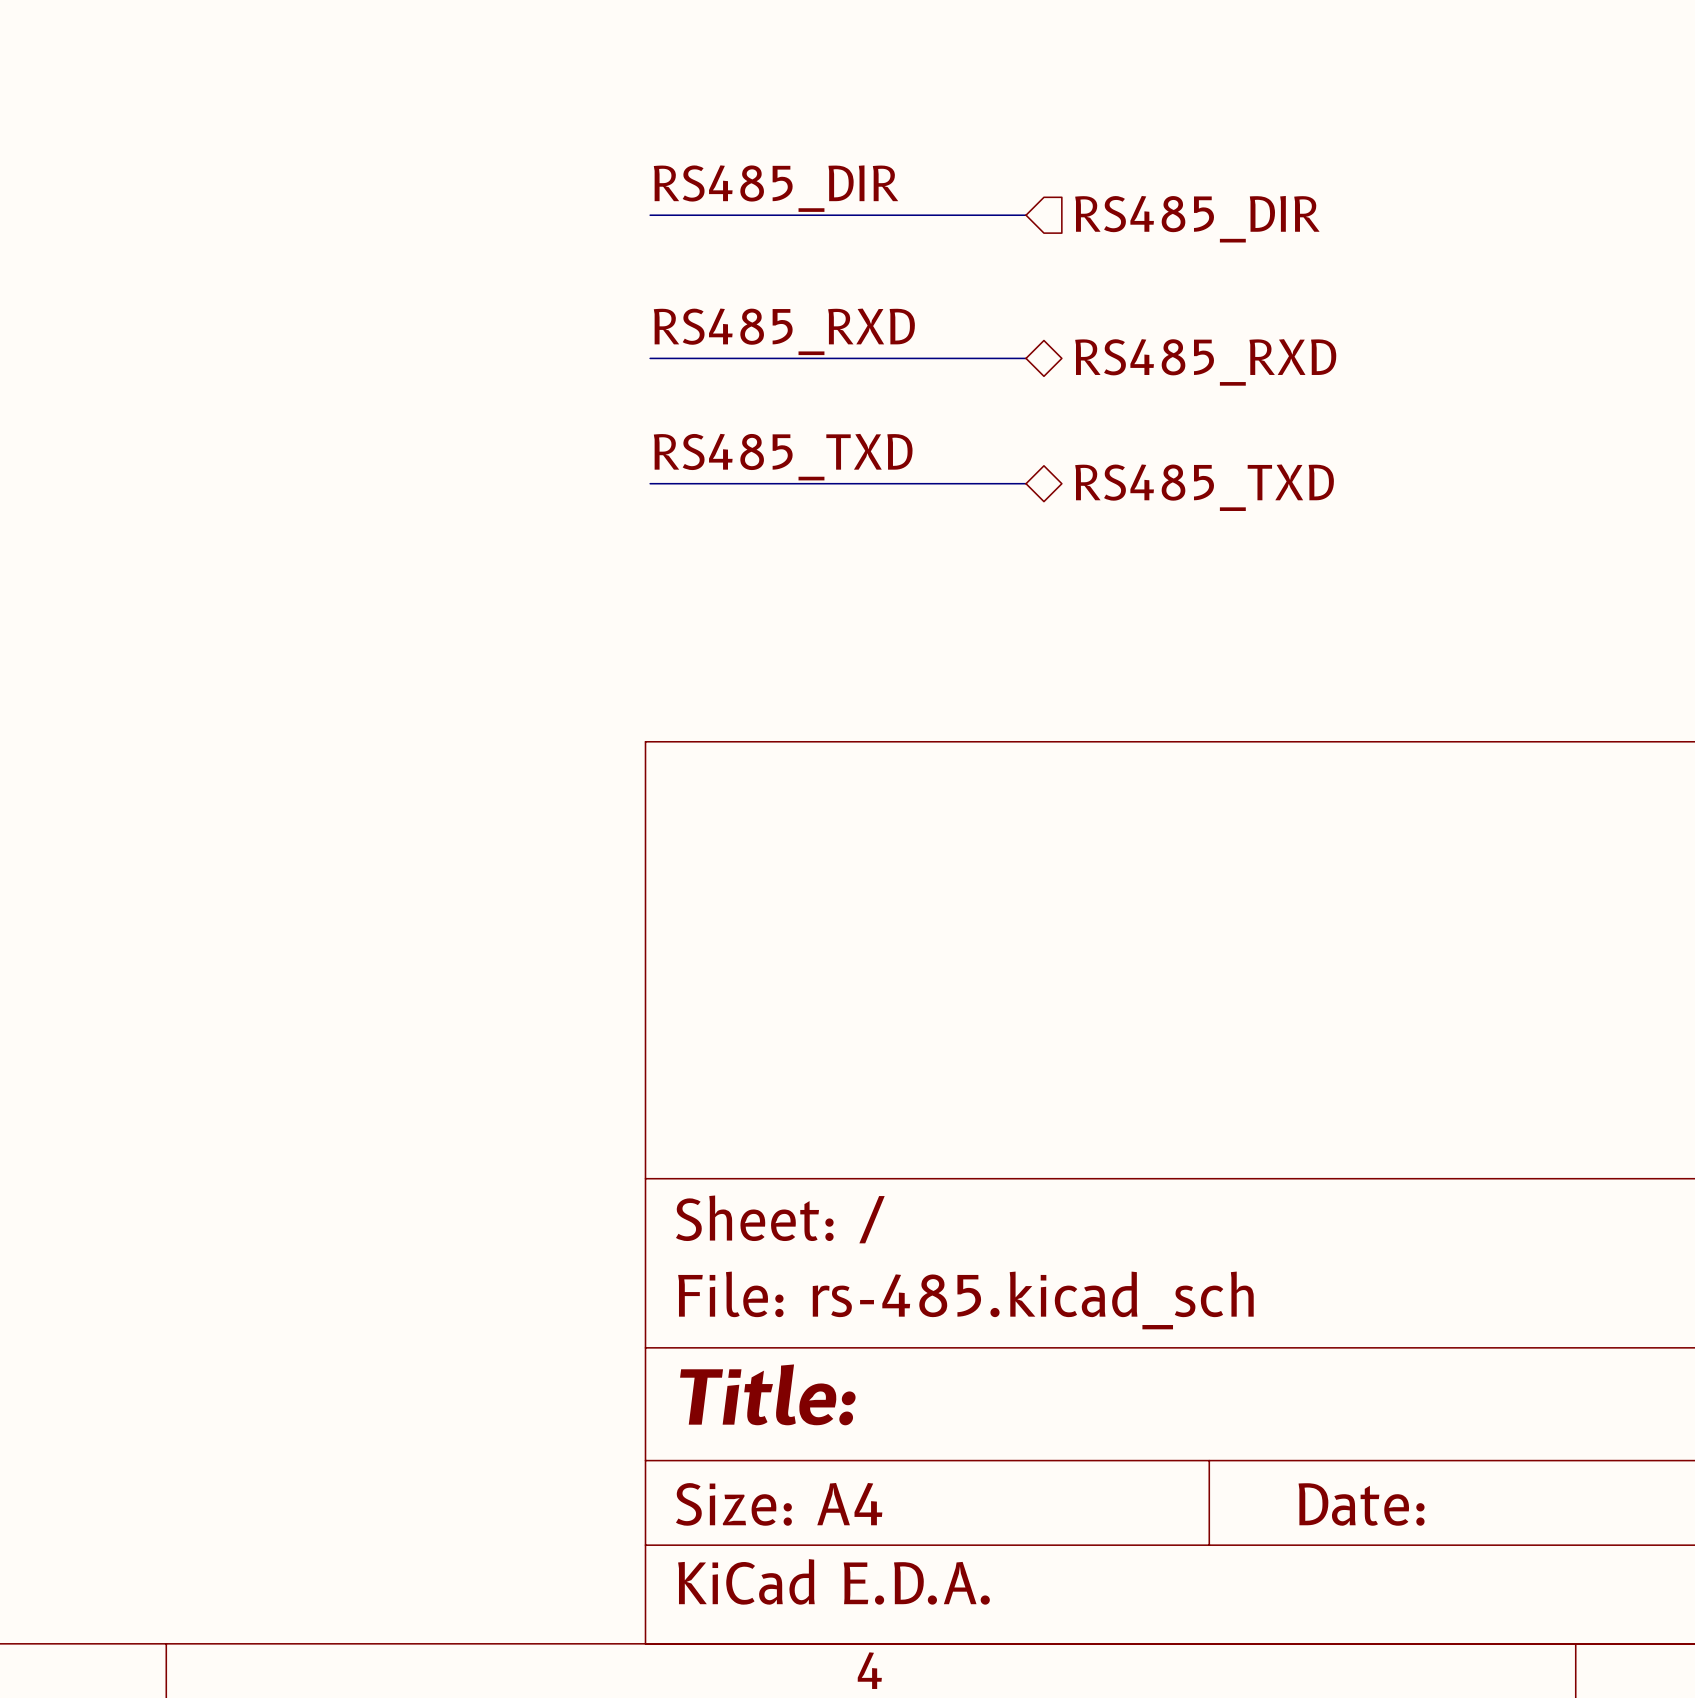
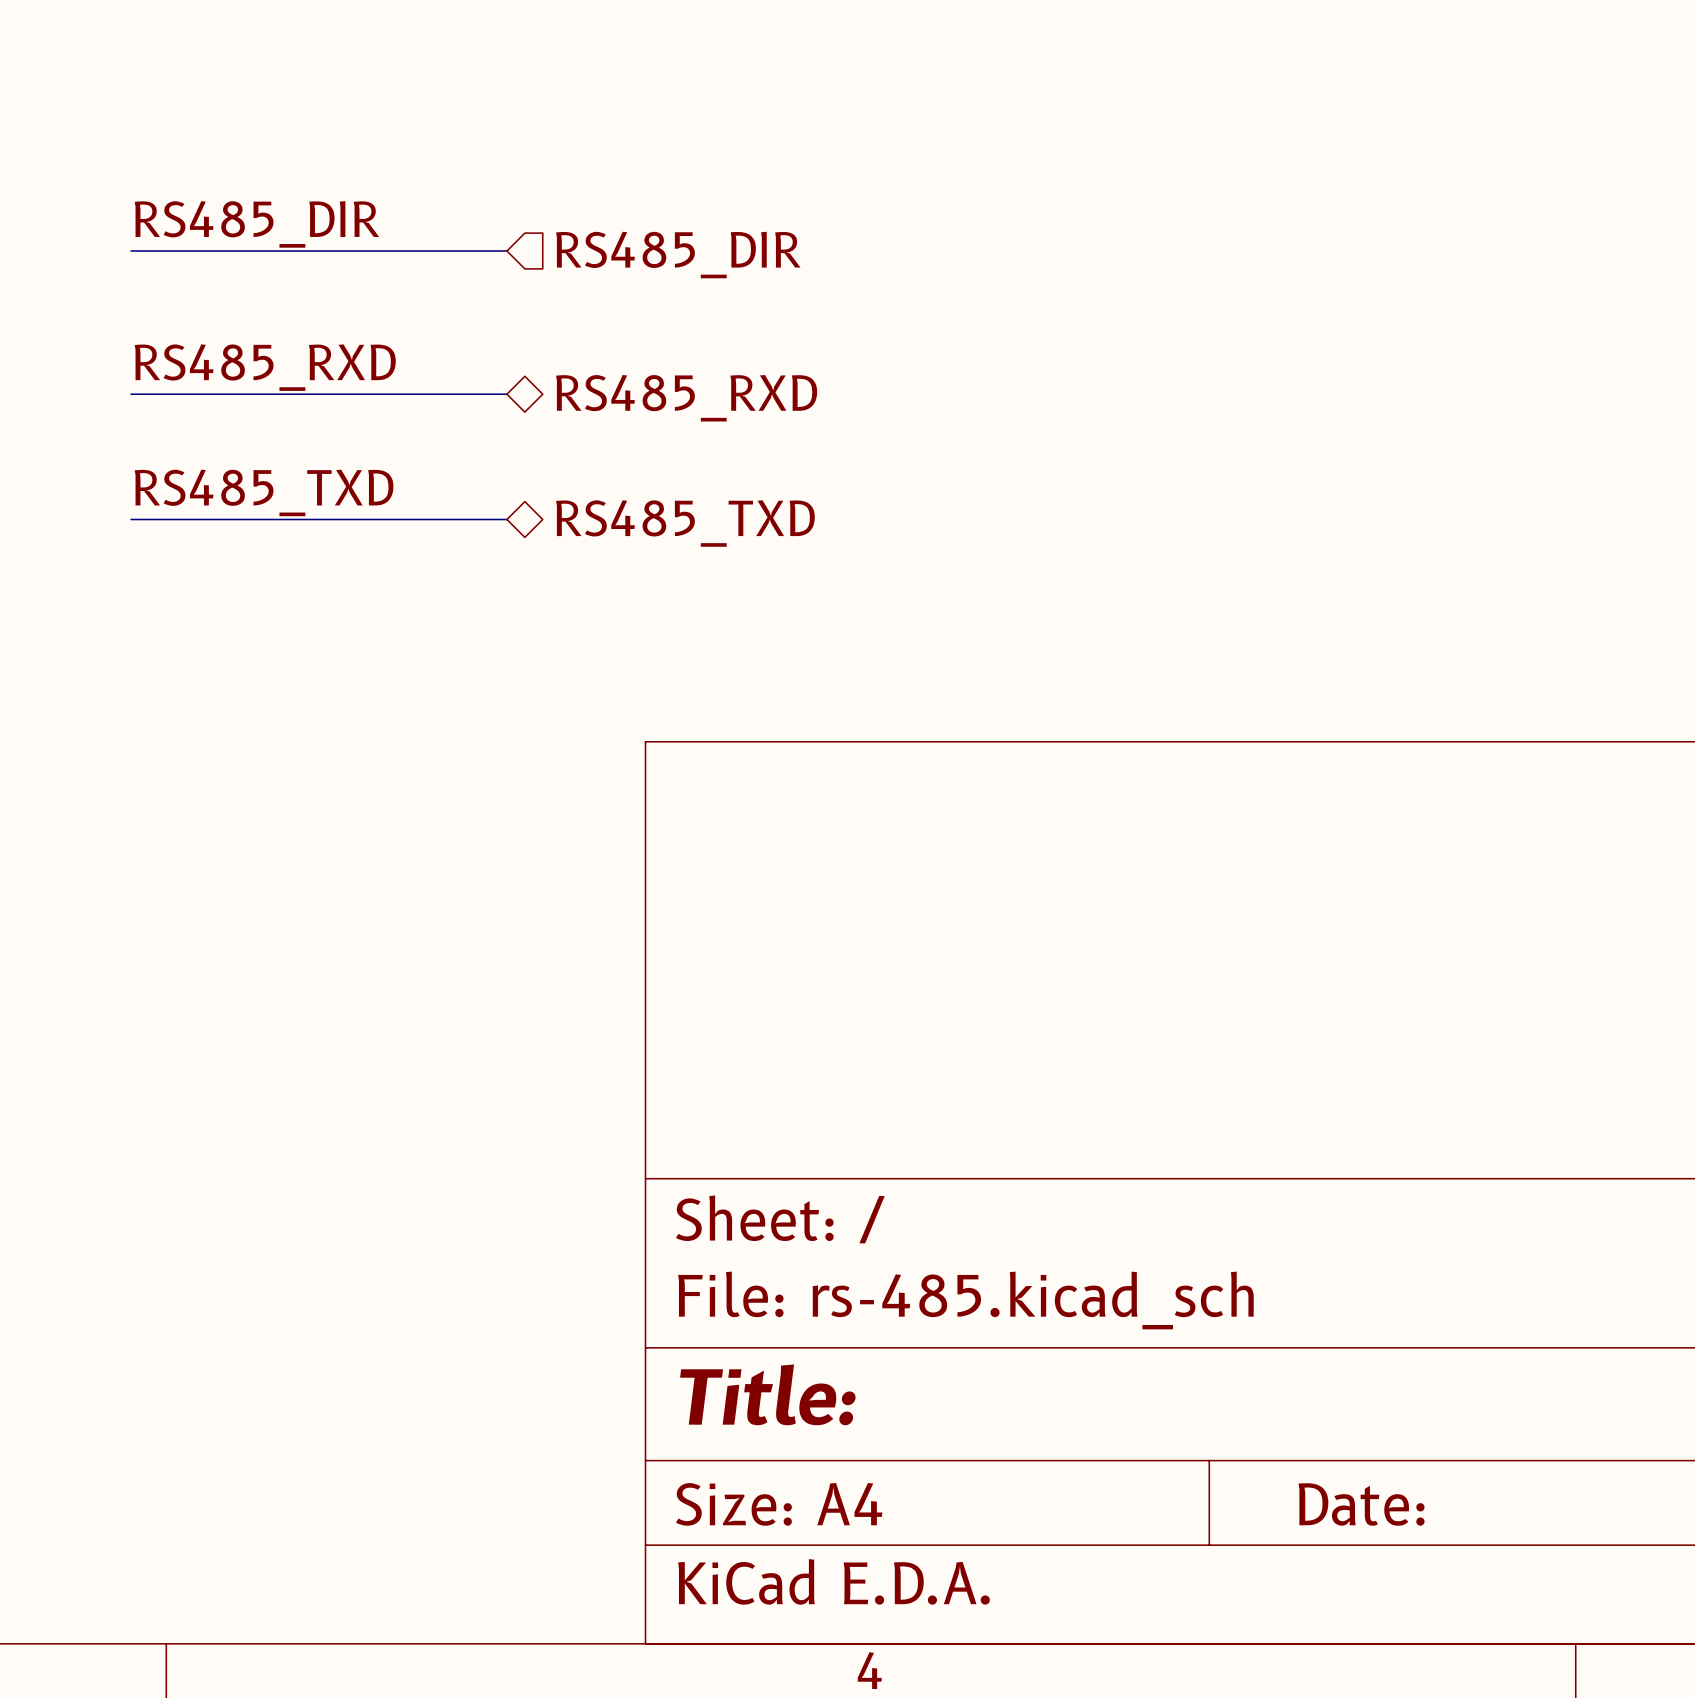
label position: RS485_DIR (776, 188) -> RS485_DIR (256, 224)
wire: (650, 215) (1026, 215) -> (131, 251) (506, 251)
hierarchical label position: RS485_DIR (1197, 219) -> RS485_DIR (678, 255)
label position: RS485_RXD (784, 331) -> RS485_RXD (265, 367)
wire: (650, 358) (1026, 358) -> (131, 394) (506, 394)
hierarchical label position: RS485_RXD (1205, 362) -> RS485_RXD (686, 398)
label position: RS485_TXD (783, 457) -> RS485_TXD (264, 492)
wire: (650, 483) (1026, 483) -> (131, 519) (506, 519)
hierarchical label position: RS485_TXD (1204, 487) -> RS485_TXD (685, 523)

